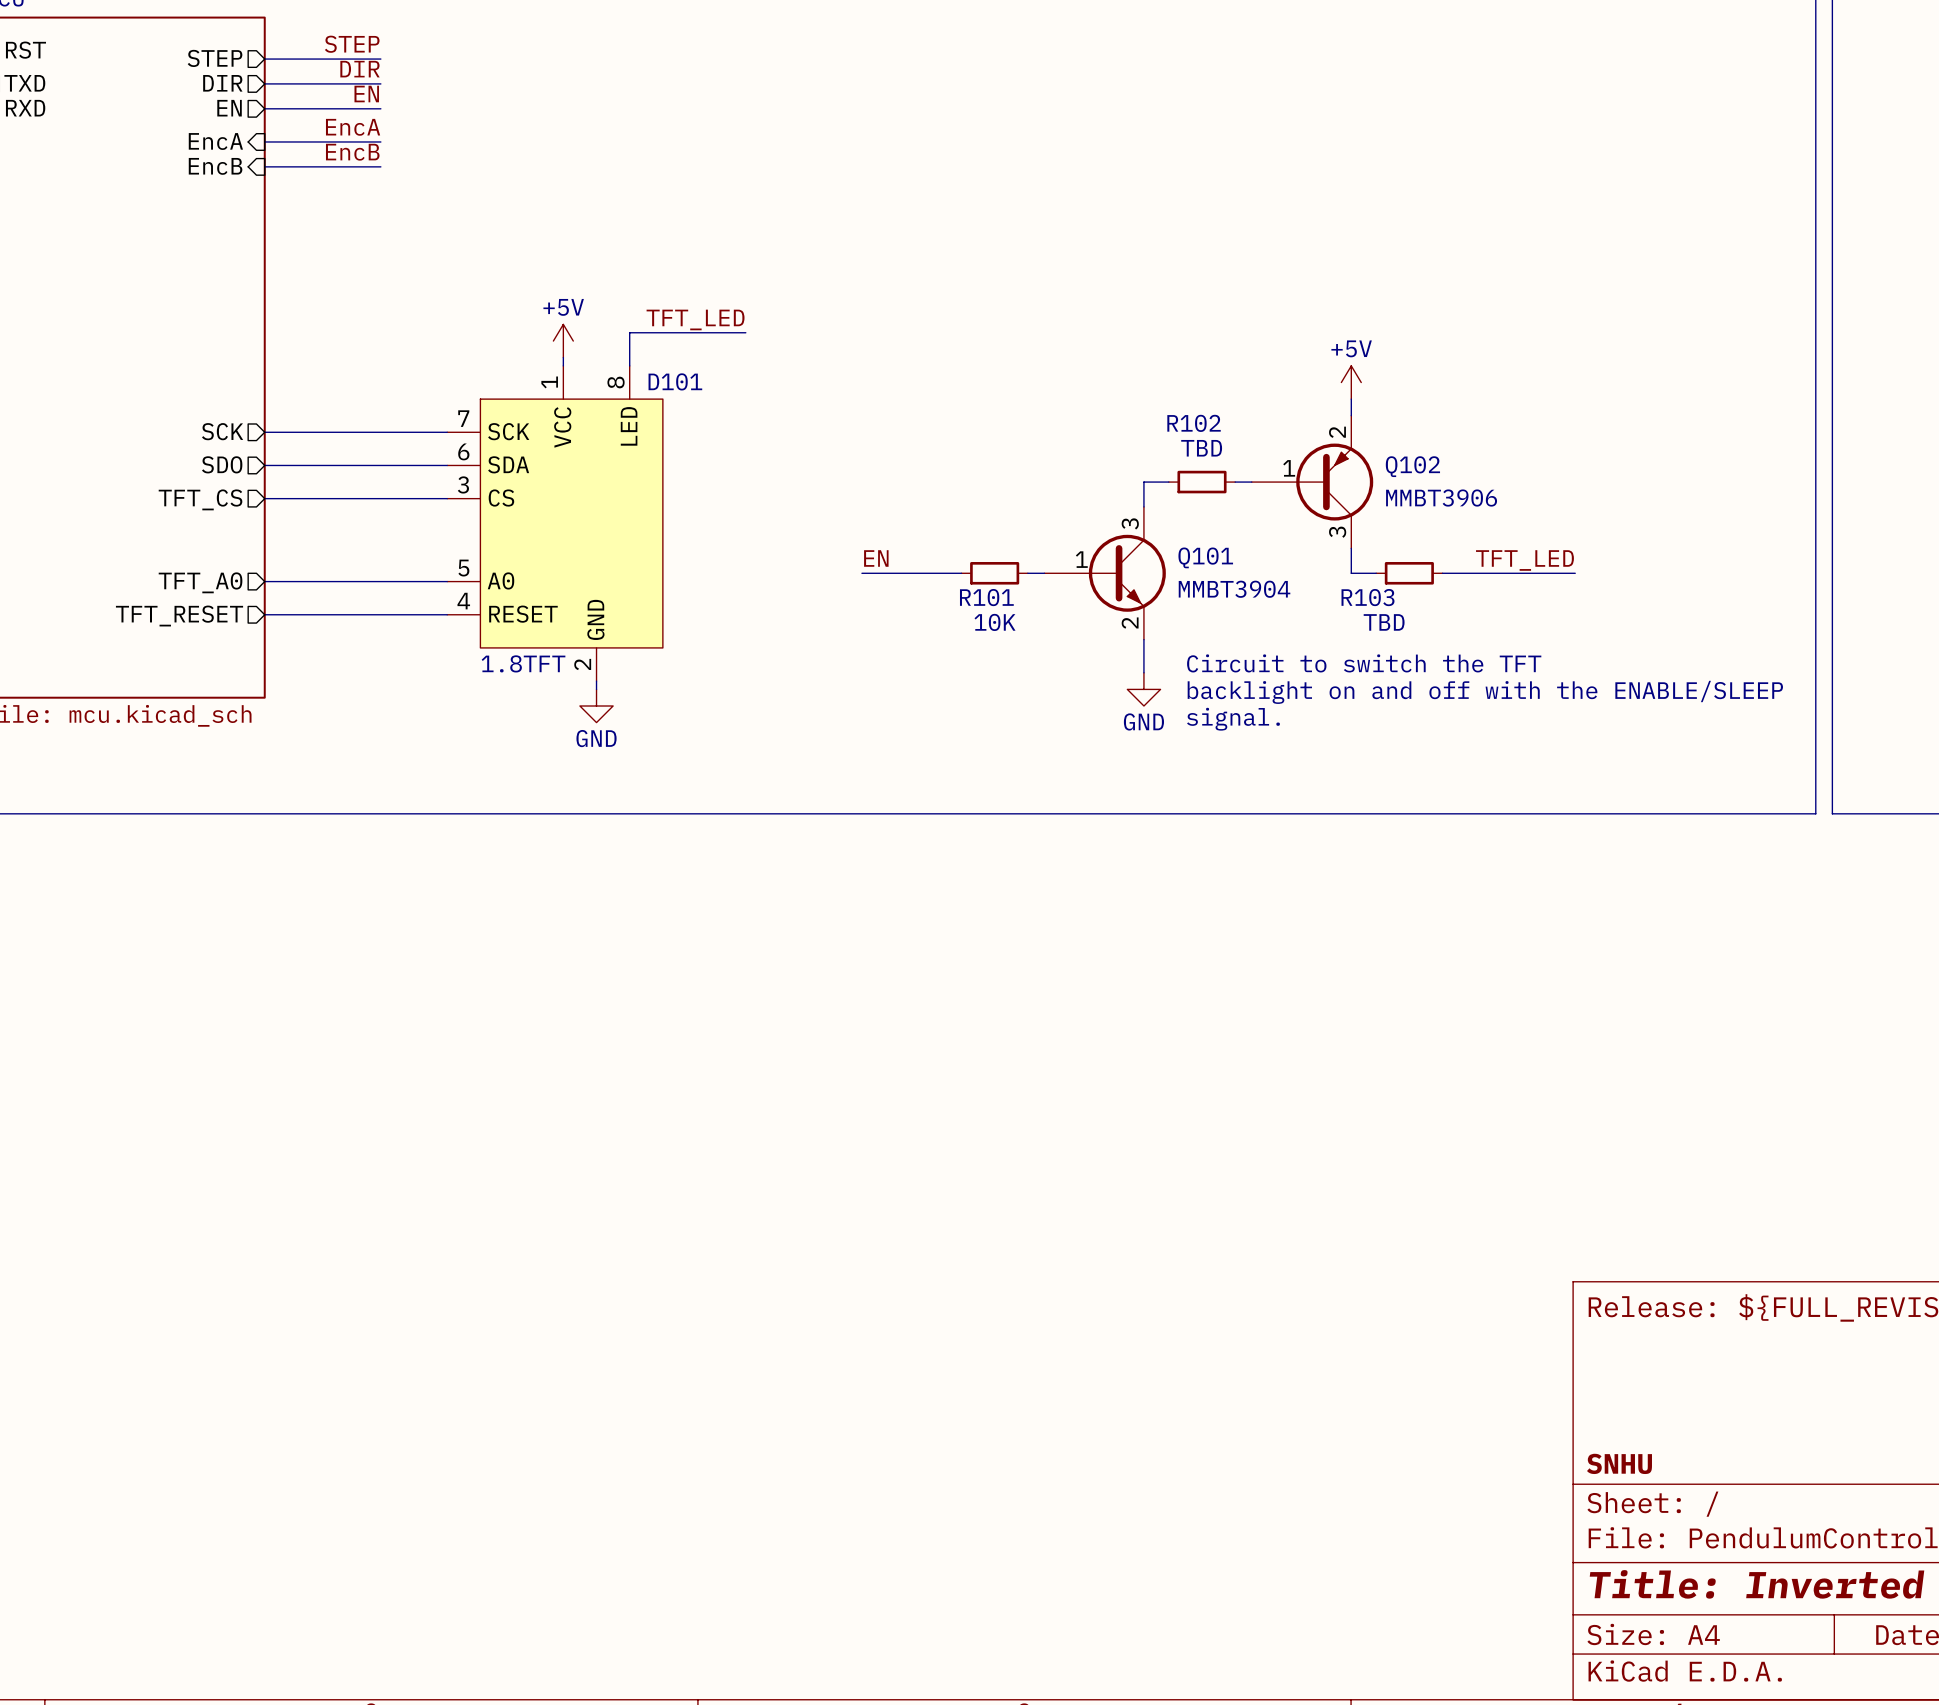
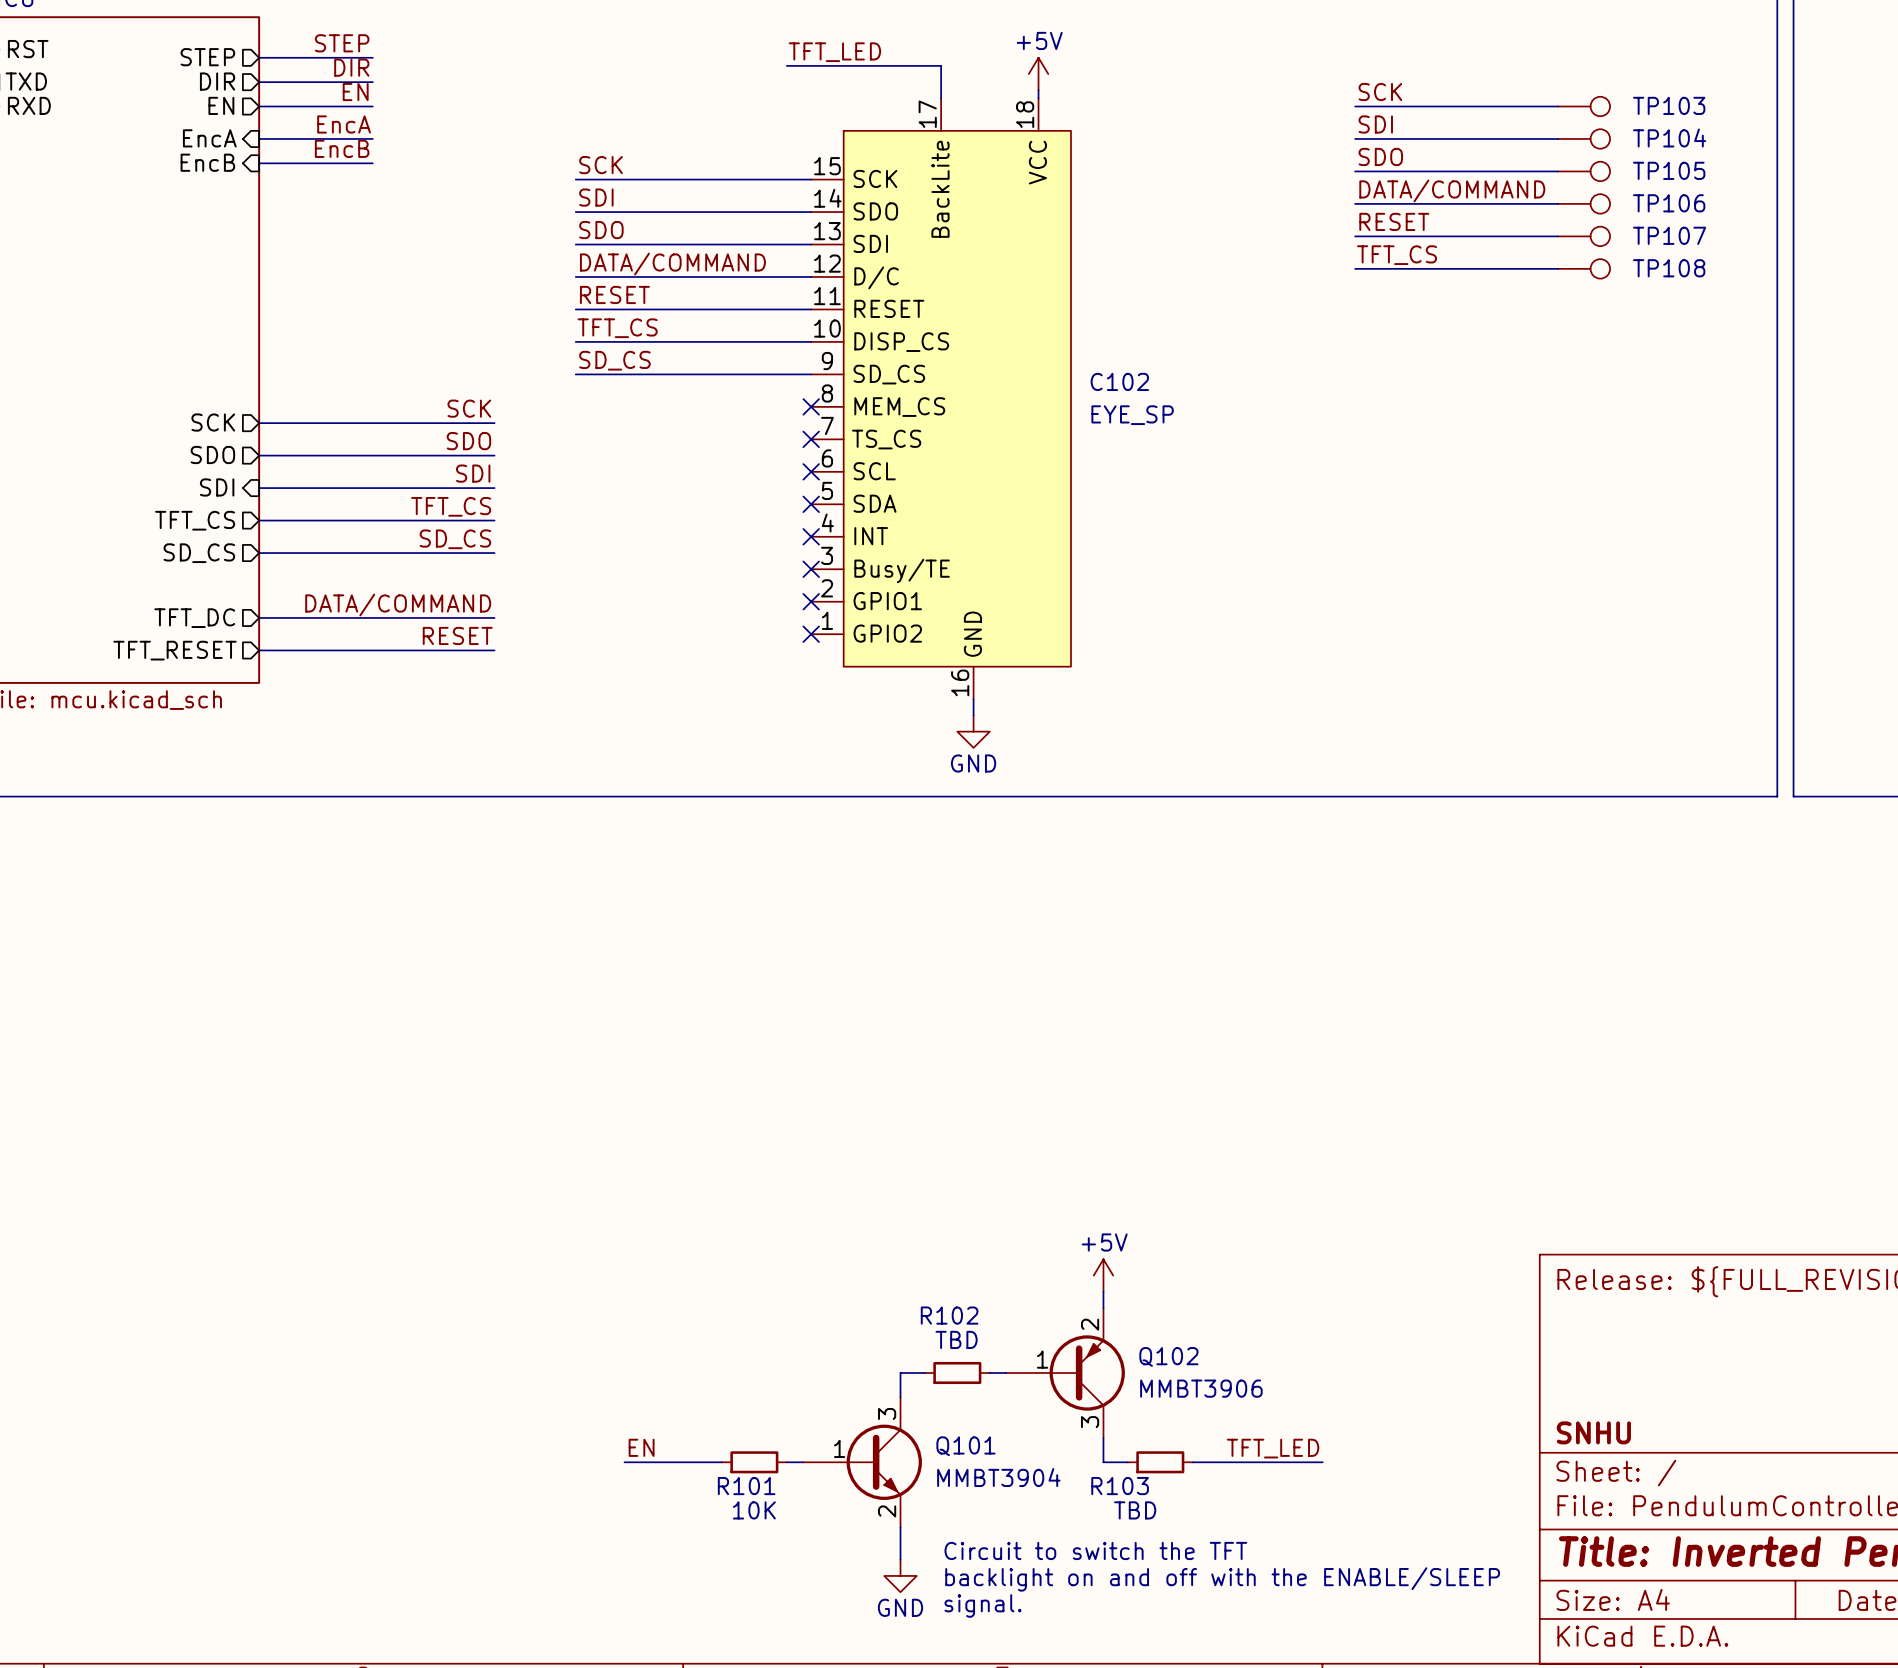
wire: none -> (786, 65) (941, 65) (941, 98)
power symbol: none -> +5V (1038, 74)
wire: none -> (1038, 90) (1038, 98)
label: none -> SCK (1380, 92)
wire: none -> (1355, 106) (1558, 106)
TP103: none -> (1584, 106)
label: none -> SDI (1375, 124)
wire: none -> (1355, 138) (1558, 138)
TP104: none -> (1584, 138)
label: none -> SDO (1380, 156)
label: none -> SCK (601, 165)
wire: none -> (1355, 171) (1558, 171)
TP105: none -> (1584, 171)
wire: none -> (575, 179) (811, 179)
label: none -> DATA/COMMAND (1452, 190)
label: none -> SDI (596, 197)
wire: none -> (1355, 203) (1558, 203)
TP106: none -> (1584, 203)
wire: none -> (575, 212) (811, 212)
label: none -> RESET (1394, 221)
label: none -> SDO (601, 230)
wire: none -> (1355, 236) (1558, 236)
TP107: none -> (1584, 236)
wire: none -> (575, 244) (811, 244)
label: none -> TFT_CS (1397, 255)
label: none -> DATA/COMMAND (672, 264)
wire: none -> (1355, 268) (1558, 268)
TP108: none -> (1584, 268)
wire: none -> (575, 276) (811, 276)
label: none -> RESET (614, 294)
wire: none -> (575, 309) (811, 309)
label position: TFT_LED (695, 319) -> TFT_LED (834, 52)
wire: (745, 332) (629, 332) (629, 365) -> none
label: none -> TFT_CS (617, 328)
power symbol: +5V (563, 341) -> none
wire: none -> (575, 341) (811, 341)
wire: (563, 357) (563, 365) -> none
label: none -> SD_CS (614, 360)
wire: none -> (575, 374) (811, 374)
power symbol: +5V (1351, 382) -> none
wire: (1351, 399) (1351, 415) -> none
C102: none -> EYE_SP (941, 398)
no-connect mark: none -> (811, 406)
label: none -> SCK (469, 408)
no-connect mark: none -> (811, 439)
label: none -> SDO (468, 441)
no-connect mark: none -> (811, 471)
wire: (1168, 482) (1143, 482) (1143, 506) -> none
R102 position: (1202, 482) -> (957, 1372)
wire: (1235, 482) (1251, 482) -> none
Q102 position: (1312, 482) -> (1065, 1372)
label: none -> SDI (473, 473)
sheet pin shape: output (200, 499) -> input (217, 487)
sheet pin: TFT_CS (200, 499) -> SDI (217, 487)
no-connect mark: none -> (811, 504)
label: none -> TFT_CS (451, 506)
D101: 1.8TFT (555, 523) -> none
wire: none -> (259, 520) (494, 520)
sheet pin: none -> TFT_CS (195, 520)
no-connect mark: none -> (811, 536)
wire: (1351, 548) (1351, 573) (1376, 573) -> none
label: none -> SD_CS (455, 539)
label: EN (876, 558) -> none
label: TFT_LED (1524, 560) -> none
wire: none -> (259, 553) (494, 553)
sheet pin: none -> SD_CS (199, 553)
R101 position: (994, 573) -> (754, 1462)
Q101 position: (1105, 573) -> (862, 1462)
R103 position: (1409, 573) -> (1160, 1462)
wire: (1442, 573) (1575, 573) -> none
wire: (264, 581) (447, 581) -> none
no-connect mark: none -> (811, 569)
sheet pin: TFT_A0 (200, 582) -> none
wire: (264, 614) (447, 614) -> none
no-connect mark: none -> (811, 601)
sheet pin position: TFT_RESET (179, 616) -> TFT_RESET (174, 650)
label: none -> DATA/COMMAND (398, 605)
wire: none -> (259, 617) (494, 617)
sheet pin: none -> TFT_DC (194, 618)
wire: (1143, 639) (1143, 672) -> none
no-connect mark: none -> (811, 634)
label: none -> RESET (457, 635)
text: Circuit to switch the TFT (1364, 663) -> none
wire: none -> (259, 650) (494, 650)
wire: (596, 681) (596, 689) -> none
power symbol position: GND (1143, 689) -> GND (973, 731)
text: backlight on and off with the ENABLE/SLEEP (1485, 692) -> none
power symbol: GND (596, 706) -> none
wire: none -> (973, 699) (973, 715)
text: signal. (1233, 719) -> none
power symbol: none -> +5V (1103, 1275)
wire: none -> (1103, 1291) (1103, 1308)
wire: none -> (924, 1372) (900, 1372) (900, 1397)
wire: none -> (989, 1372) (1006, 1372)
wire: none -> (1103, 1437) (1103, 1462) (1127, 1462)
label: none -> EN (641, 1447)
label: none -> TFT_LED (1273, 1448)
wire: none -> (624, 1462) (721, 1462)
wire: none -> (786, 1462) (803, 1462)
wire: none -> (1192, 1462) (1322, 1462)
wire: none -> (900, 1527) (900, 1559)
text: none -> Circuit to switch the TFT (1095, 1550)
power symbol: none -> GND (900, 1575)
text: none -> backlight on and off with the ENABLE/SLEEP (1222, 1579)
text: none -> signal. (982, 1605)

